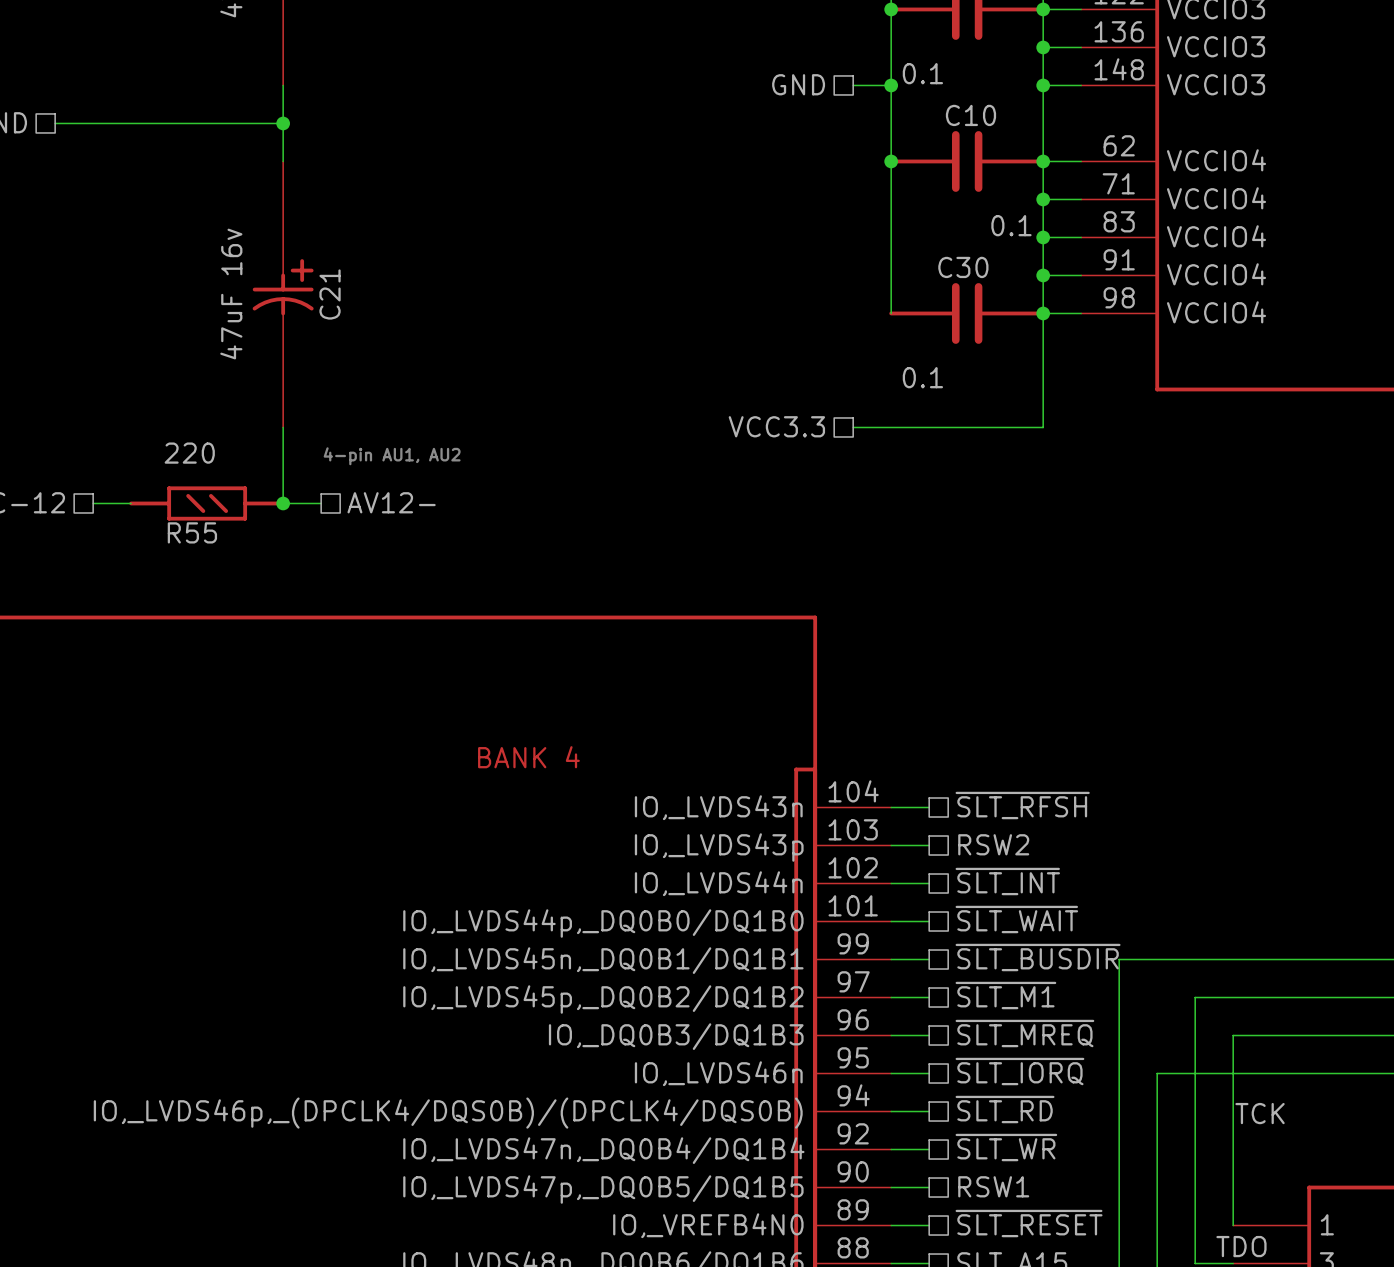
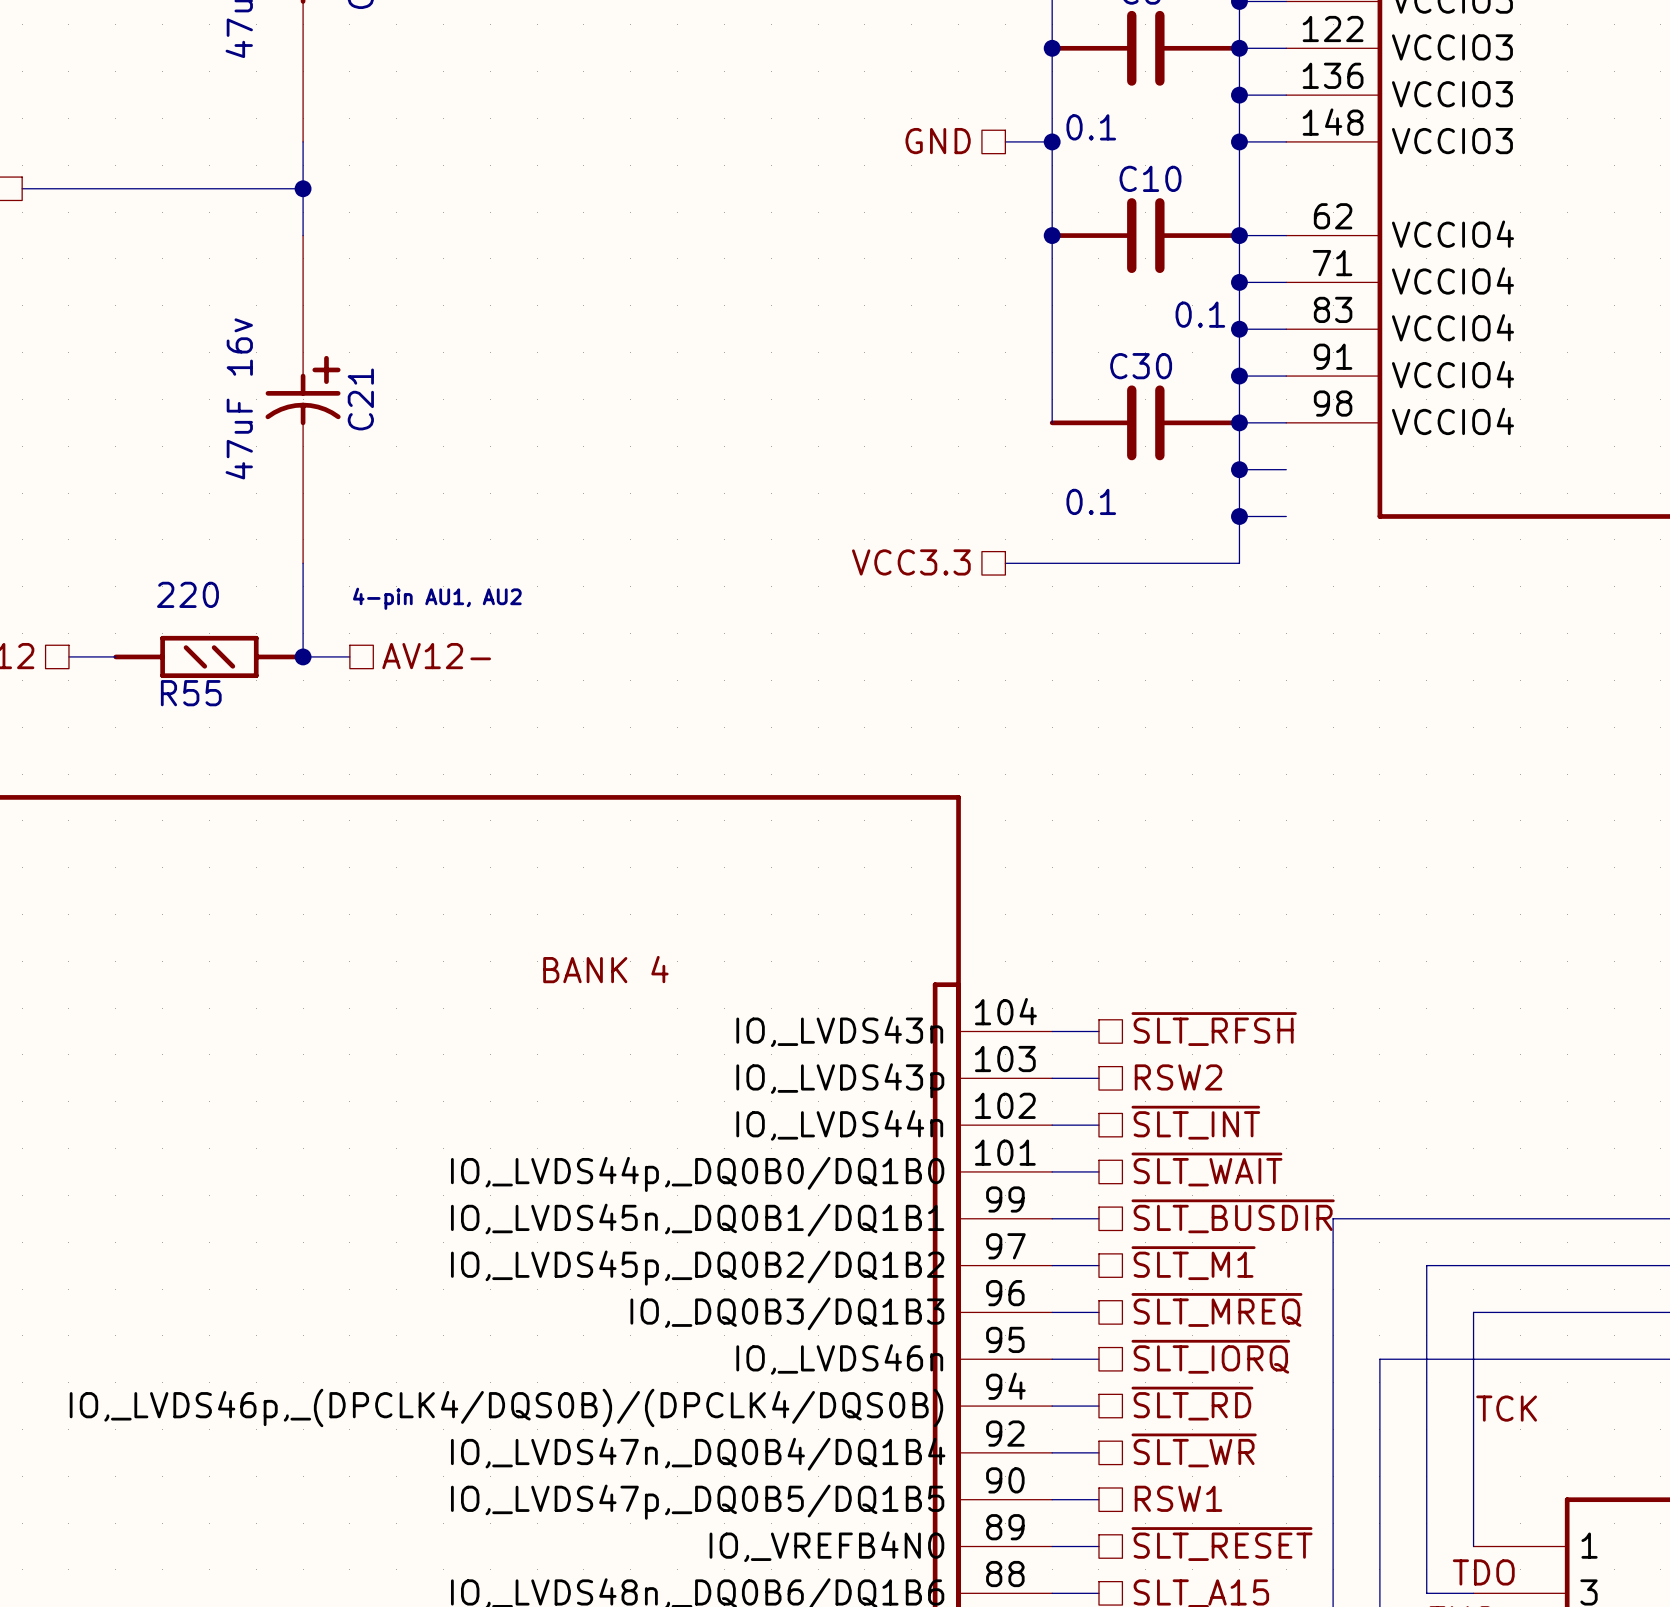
wire: none -> (1239, 469) (1286, 469)
junction: none -> (1239, 469)
wire: none -> (1239, 516) (1286, 516)
junction: none -> (1239, 516)

